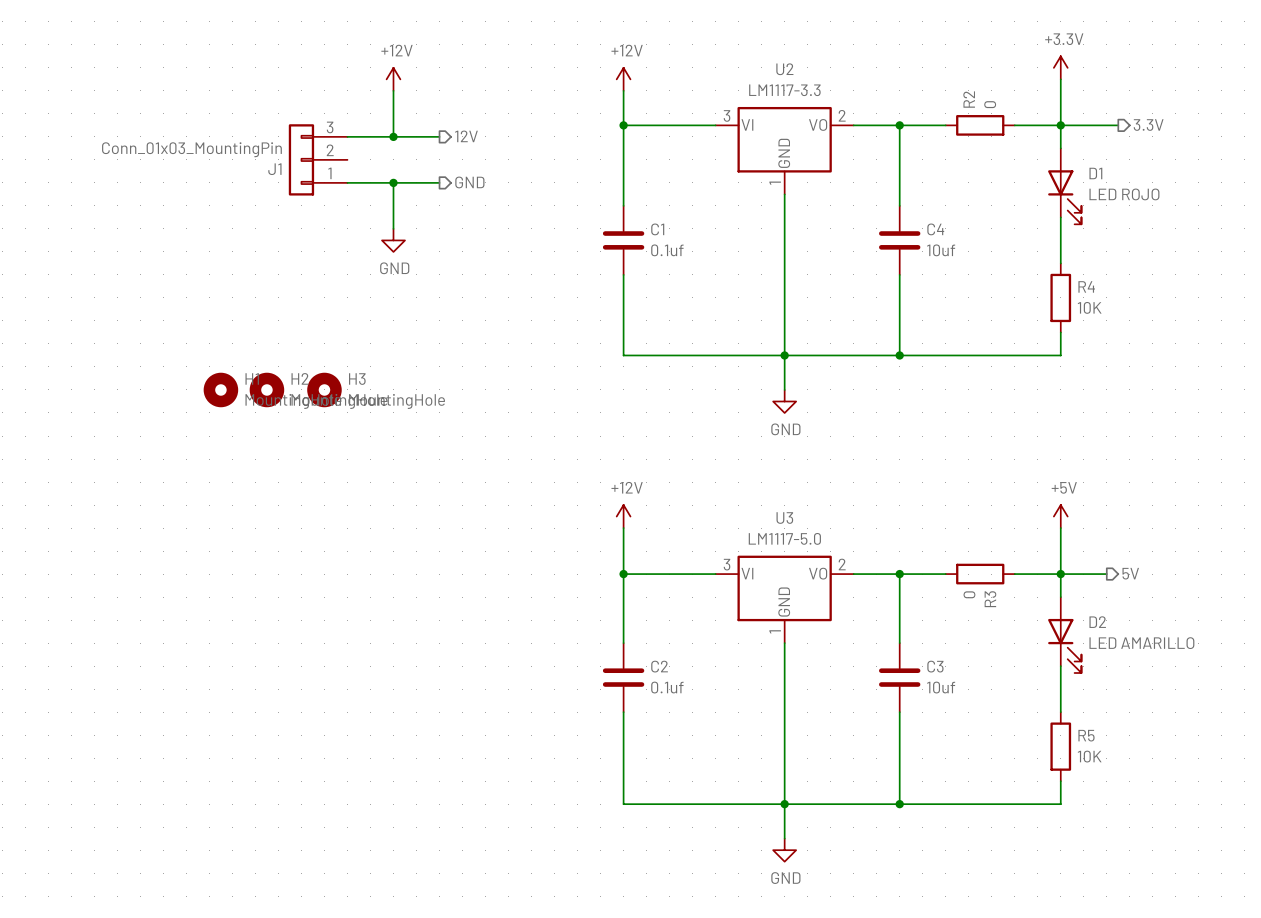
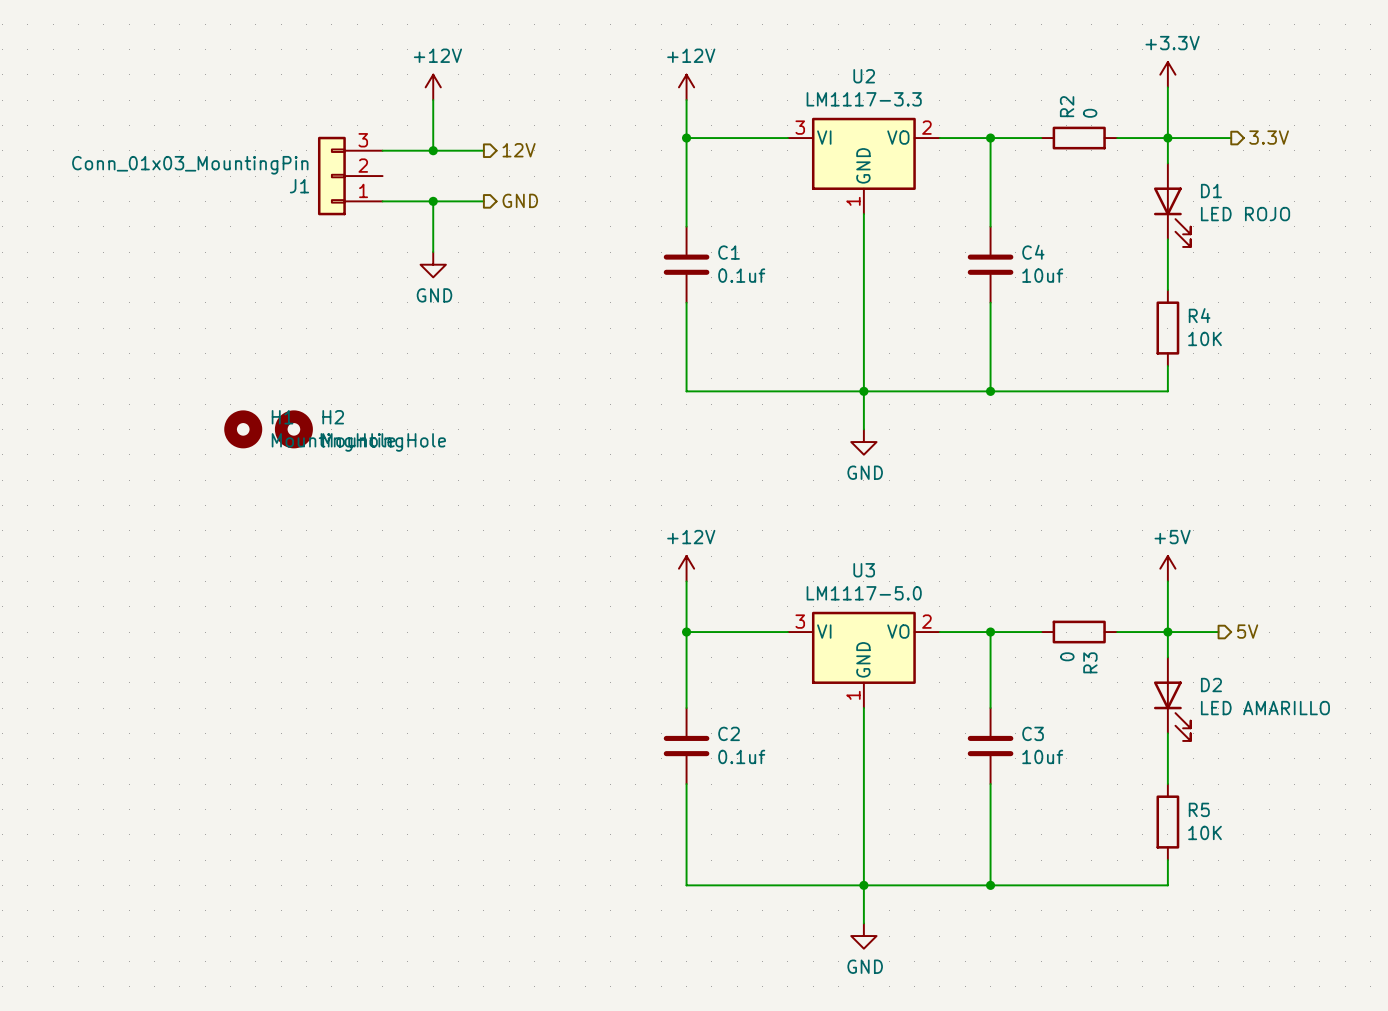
H3: MountingHole (324, 389) -> none

